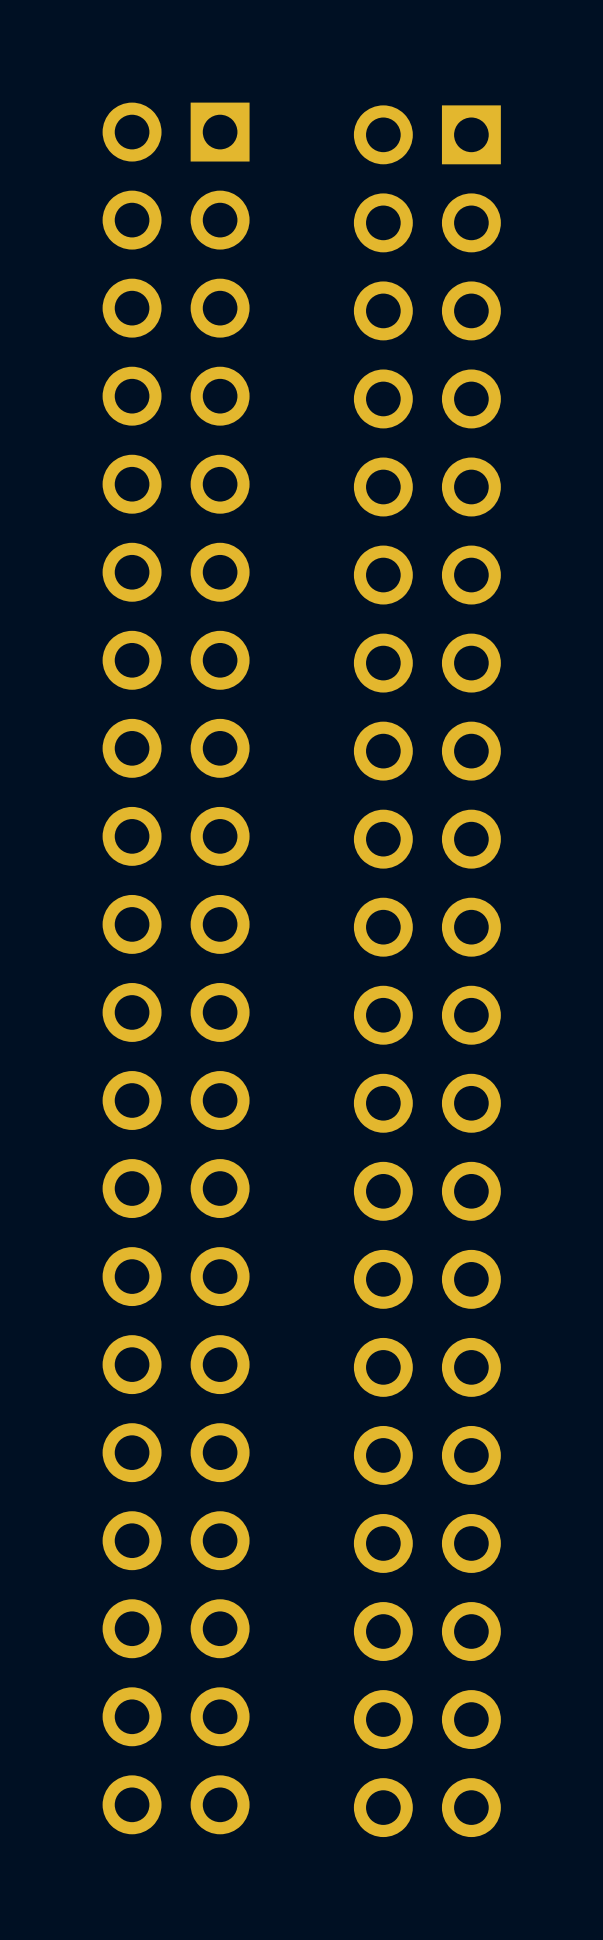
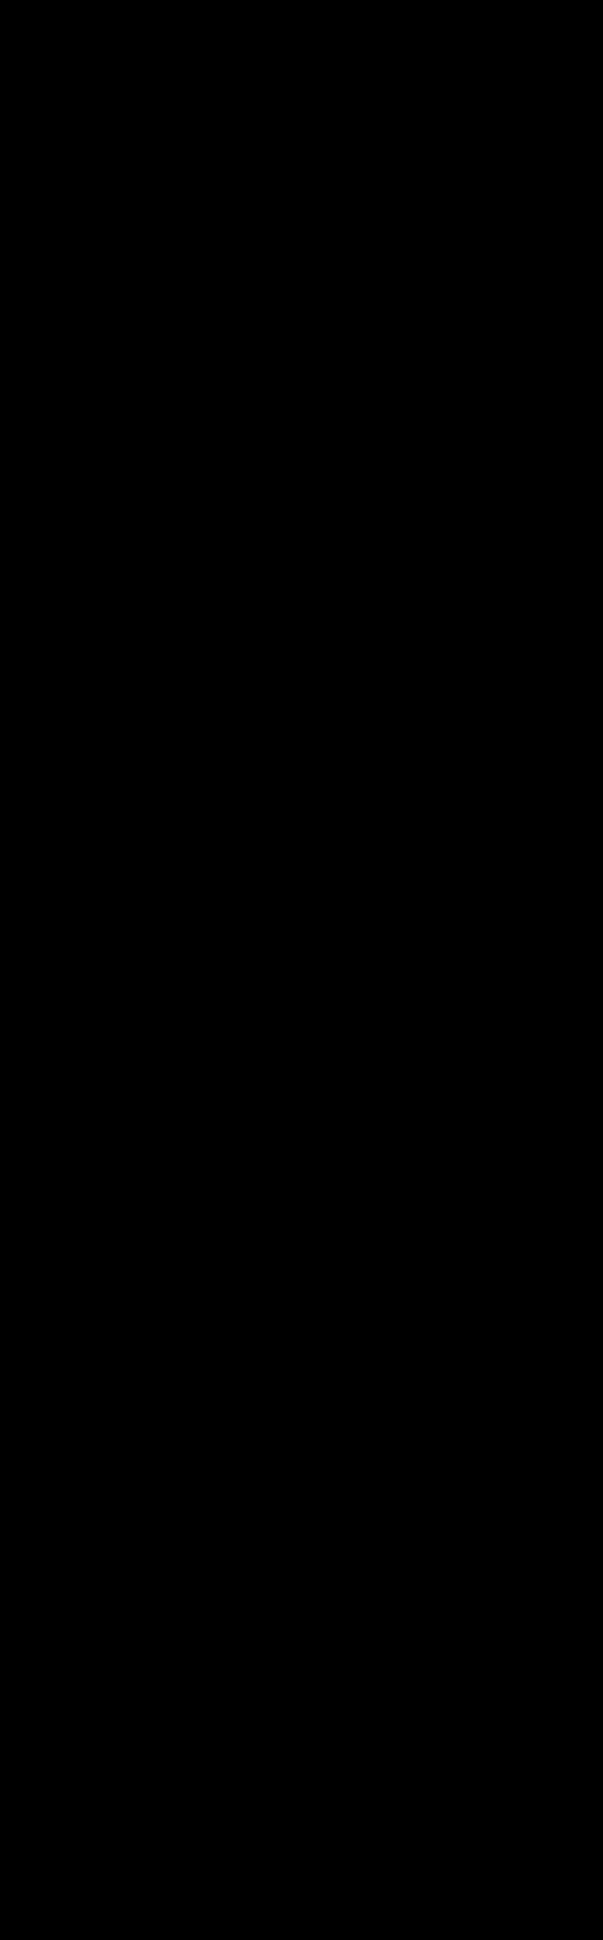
part: (176, 968) -> none
part: (427, 971) -> none

